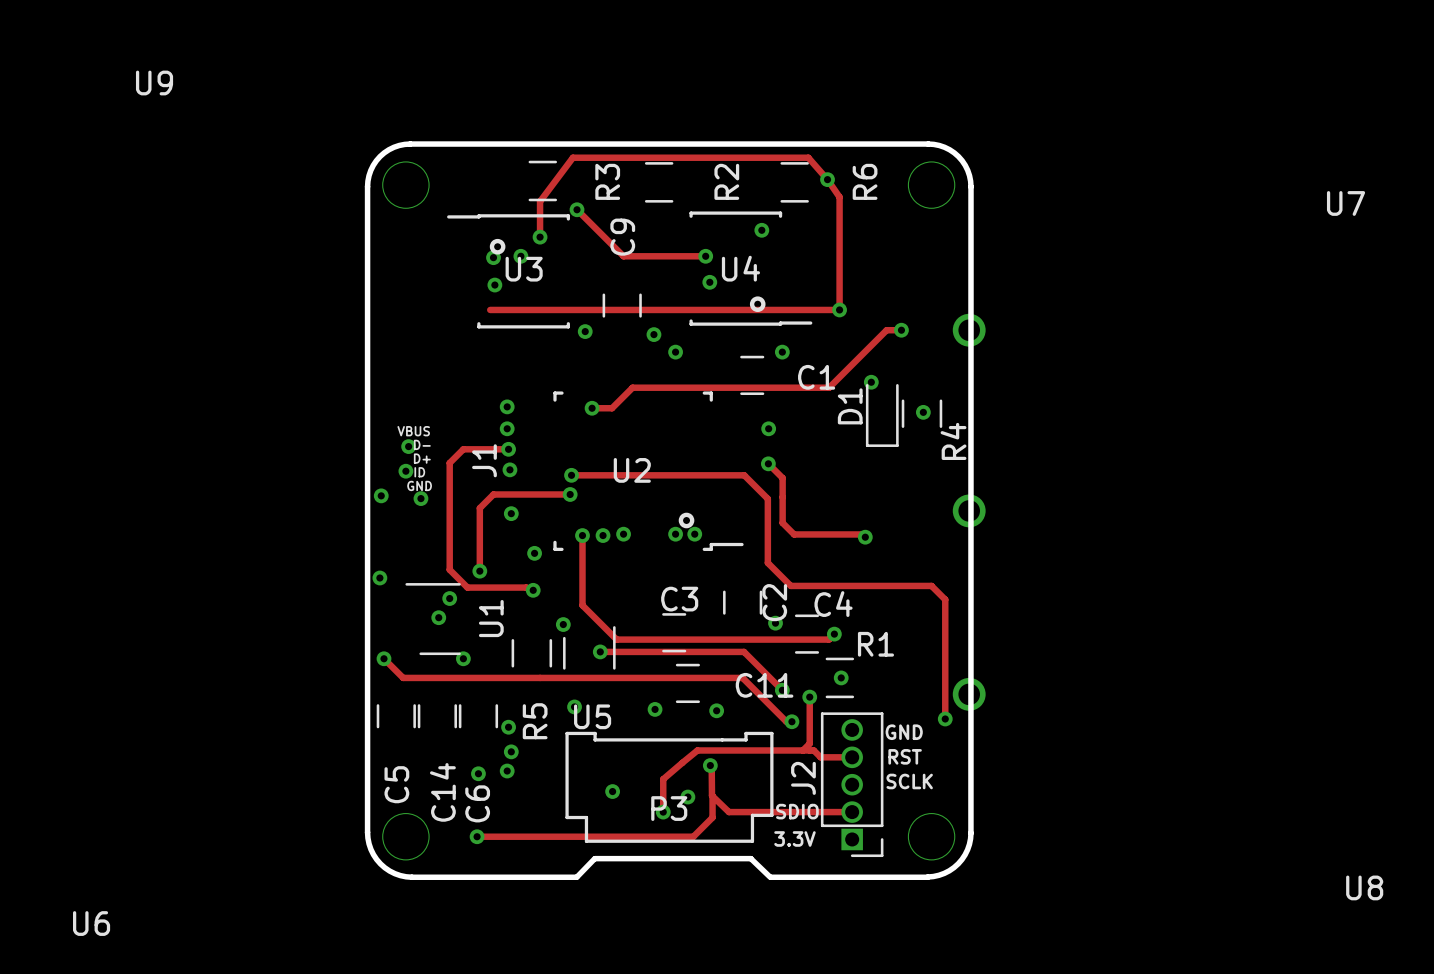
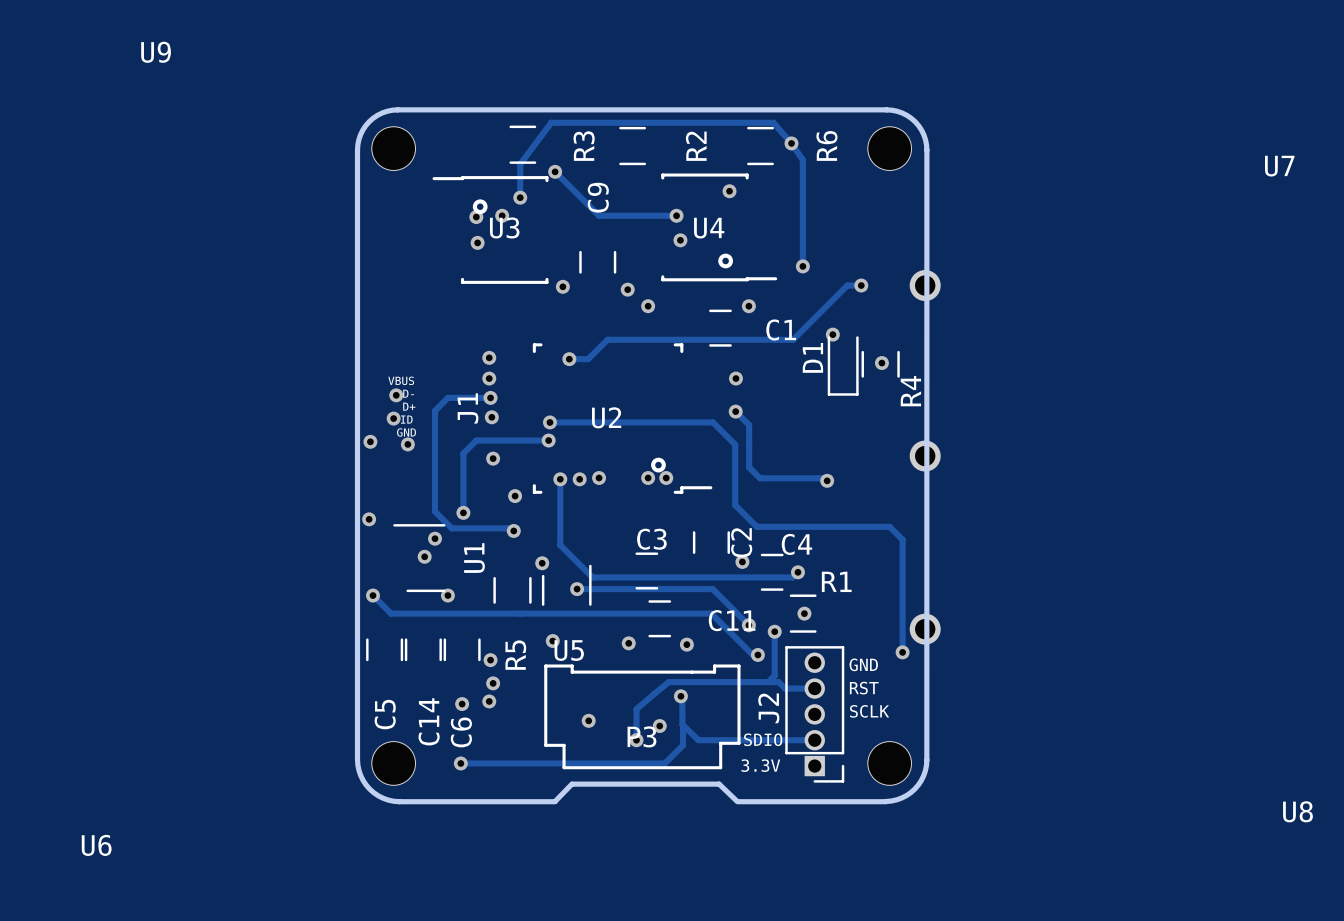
track: (490, 309) (839, 309) -> none

